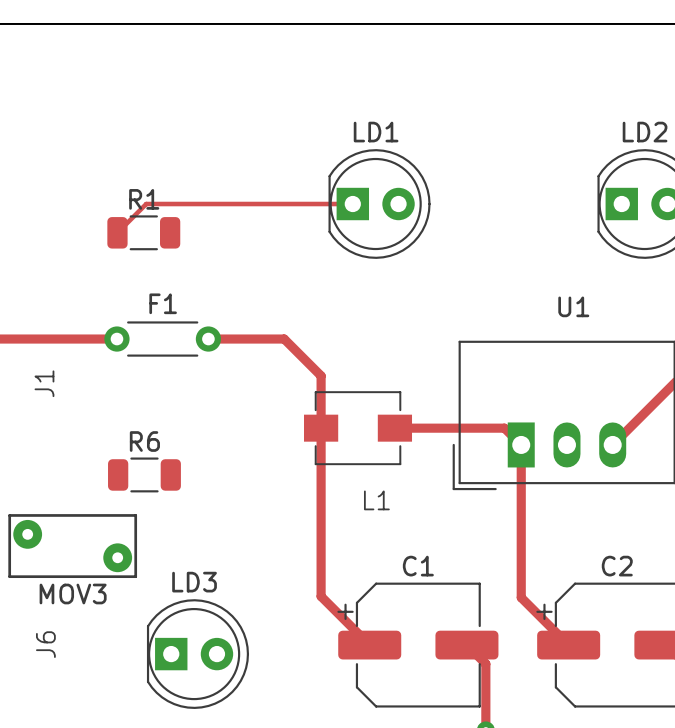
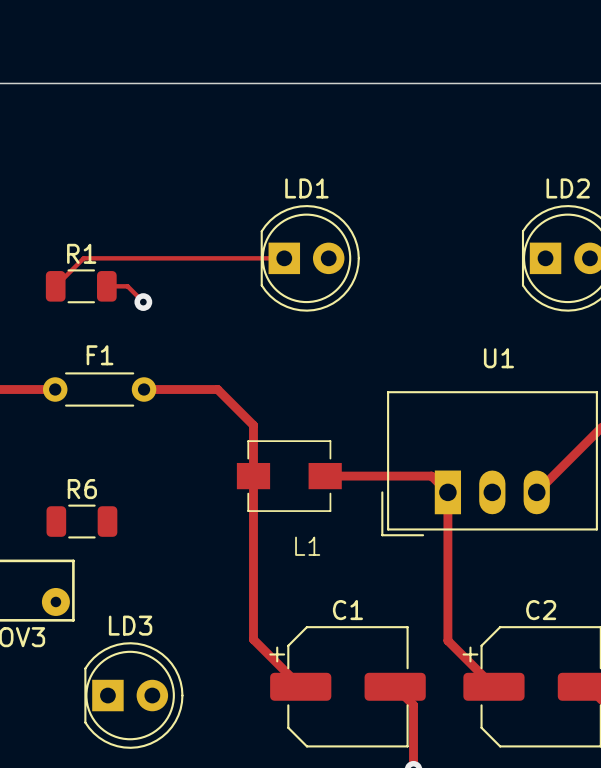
top track: none -> (106, 286) (127, 286) (143, 302)
via: none -> (143, 302)

